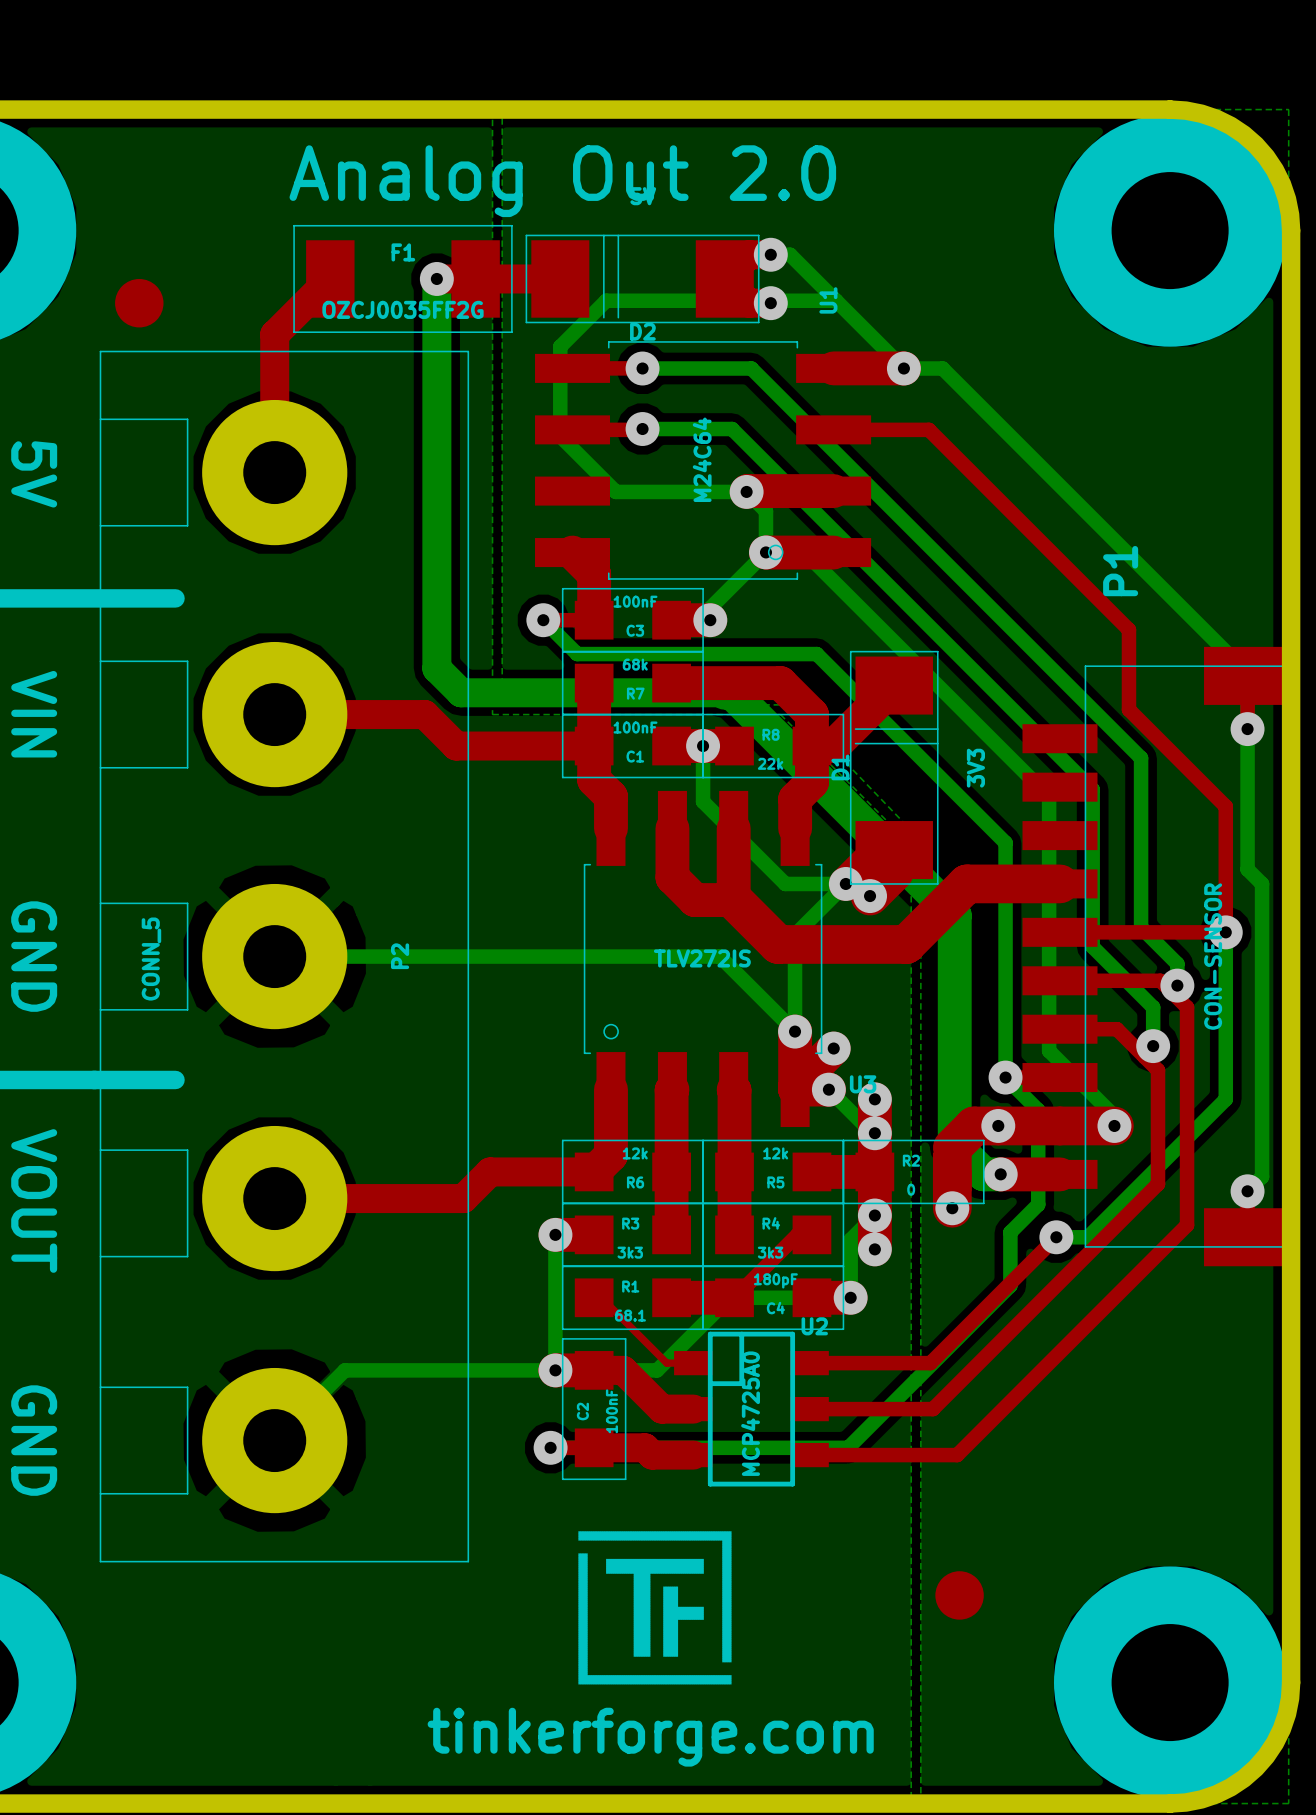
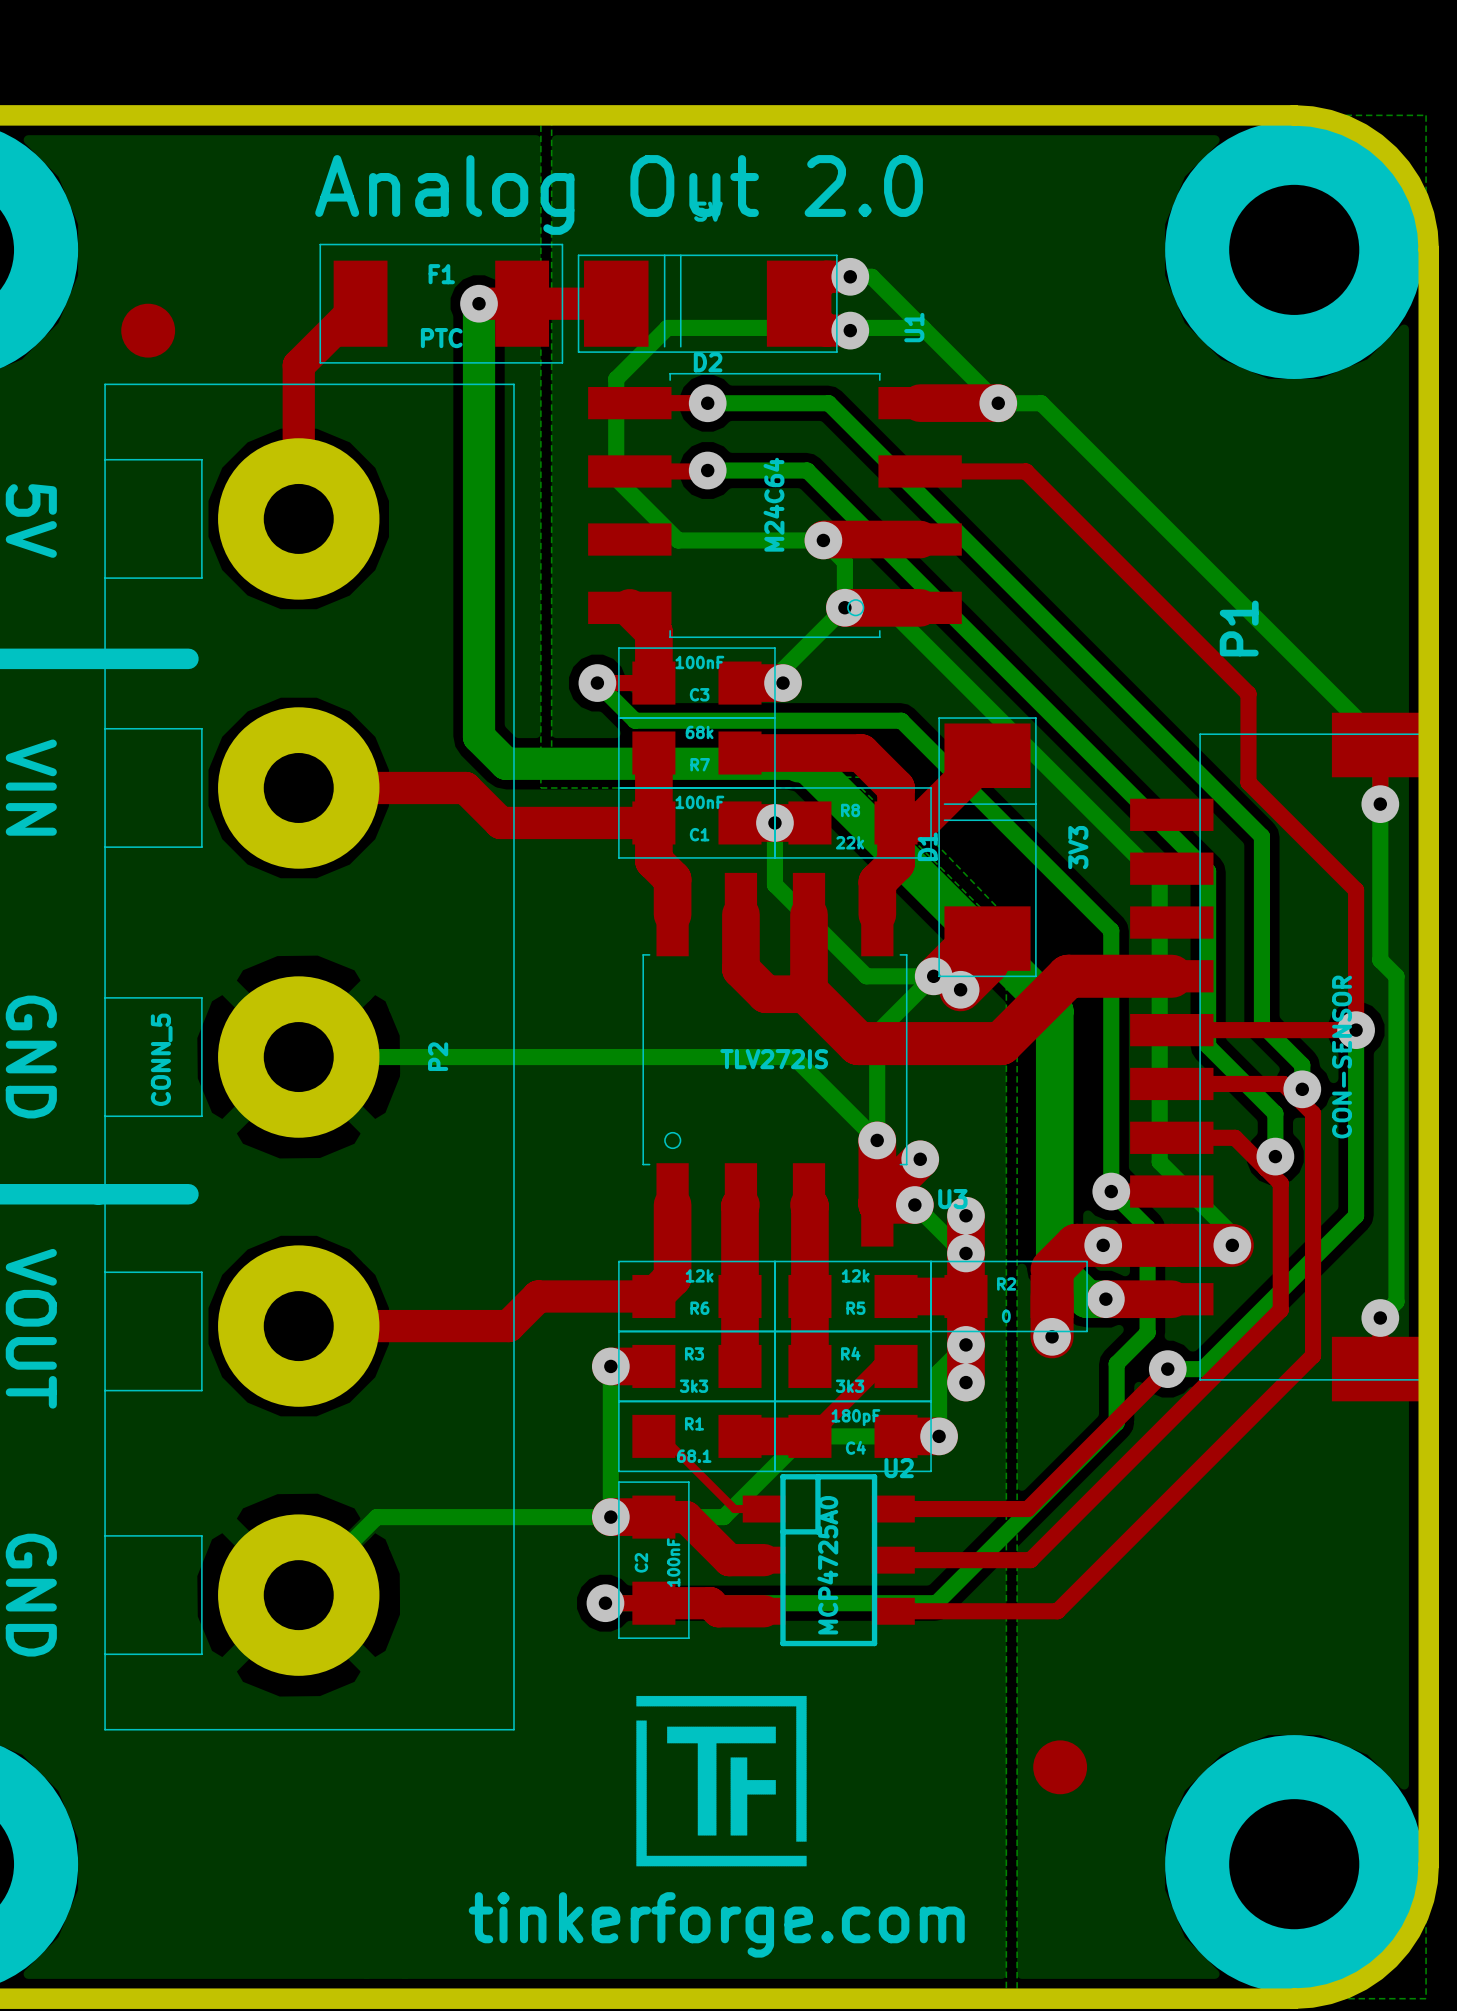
F1 value: OZCJ0035FF2G (402, 309) -> PTC (441, 338)

